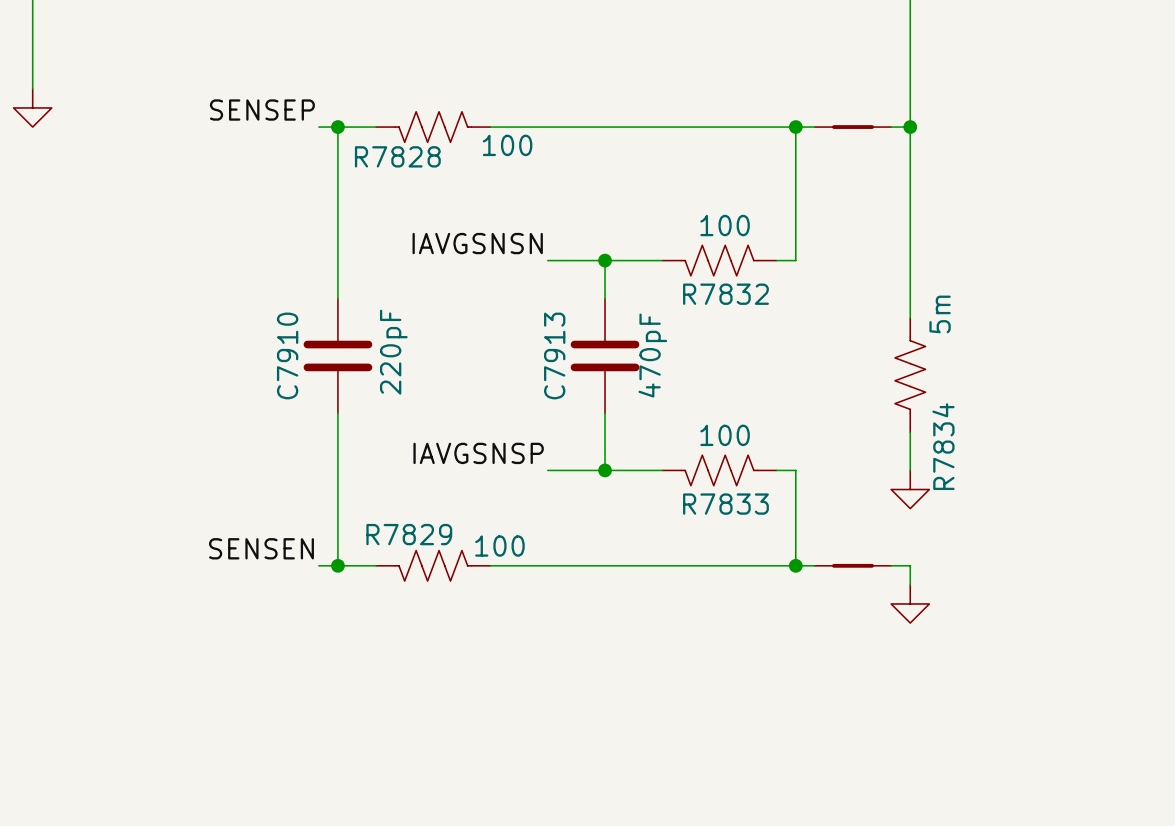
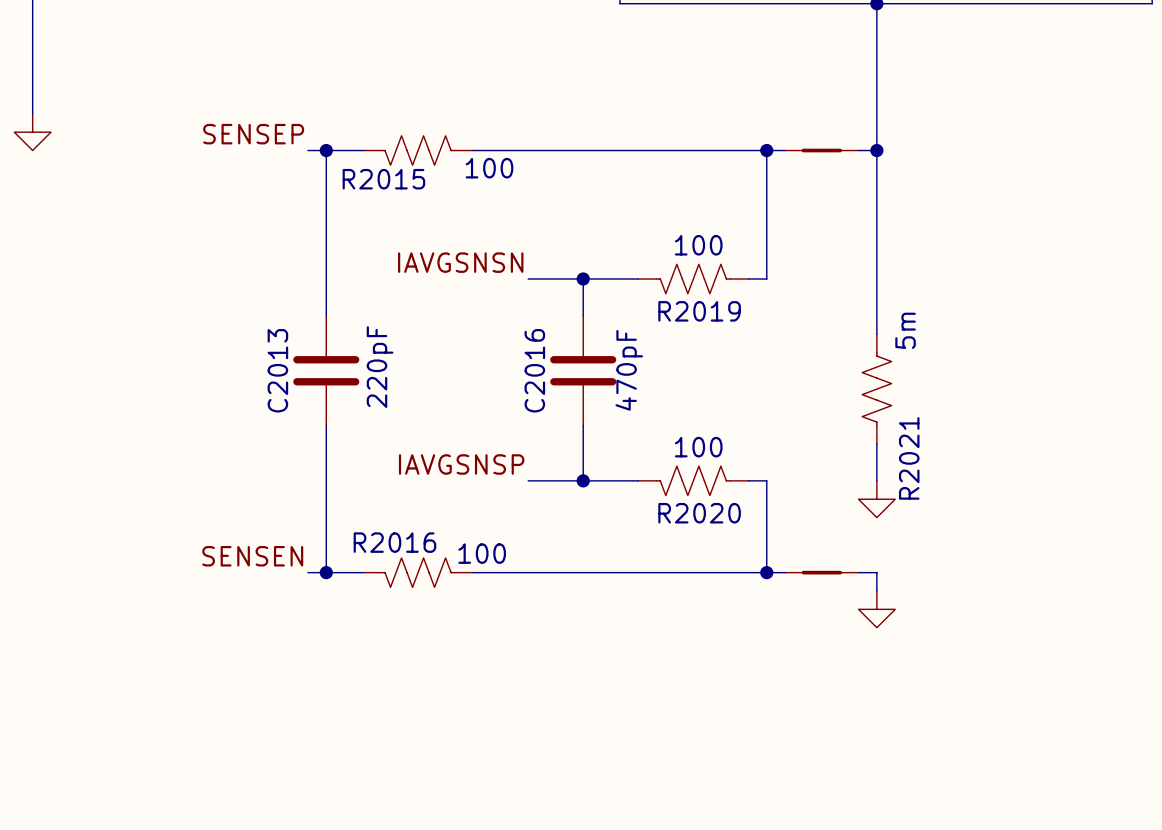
R7828 name: R7828 (397, 156) -> R2015 (383, 179)
R7832 name: R7832 (725, 294) -> R2019 (699, 311)
C7910 name: C7910 (287, 355) -> C2013 (277, 370)
C7913 name: C7913 (554, 355) -> C2016 (534, 370)
R7834 name: R7834 (943, 446) -> R2021 (909, 458)
R7833 name: R7833 (725, 504) -> R2020 (699, 513)
R7829 name: R7829 (409, 534) -> R2016 (394, 542)

